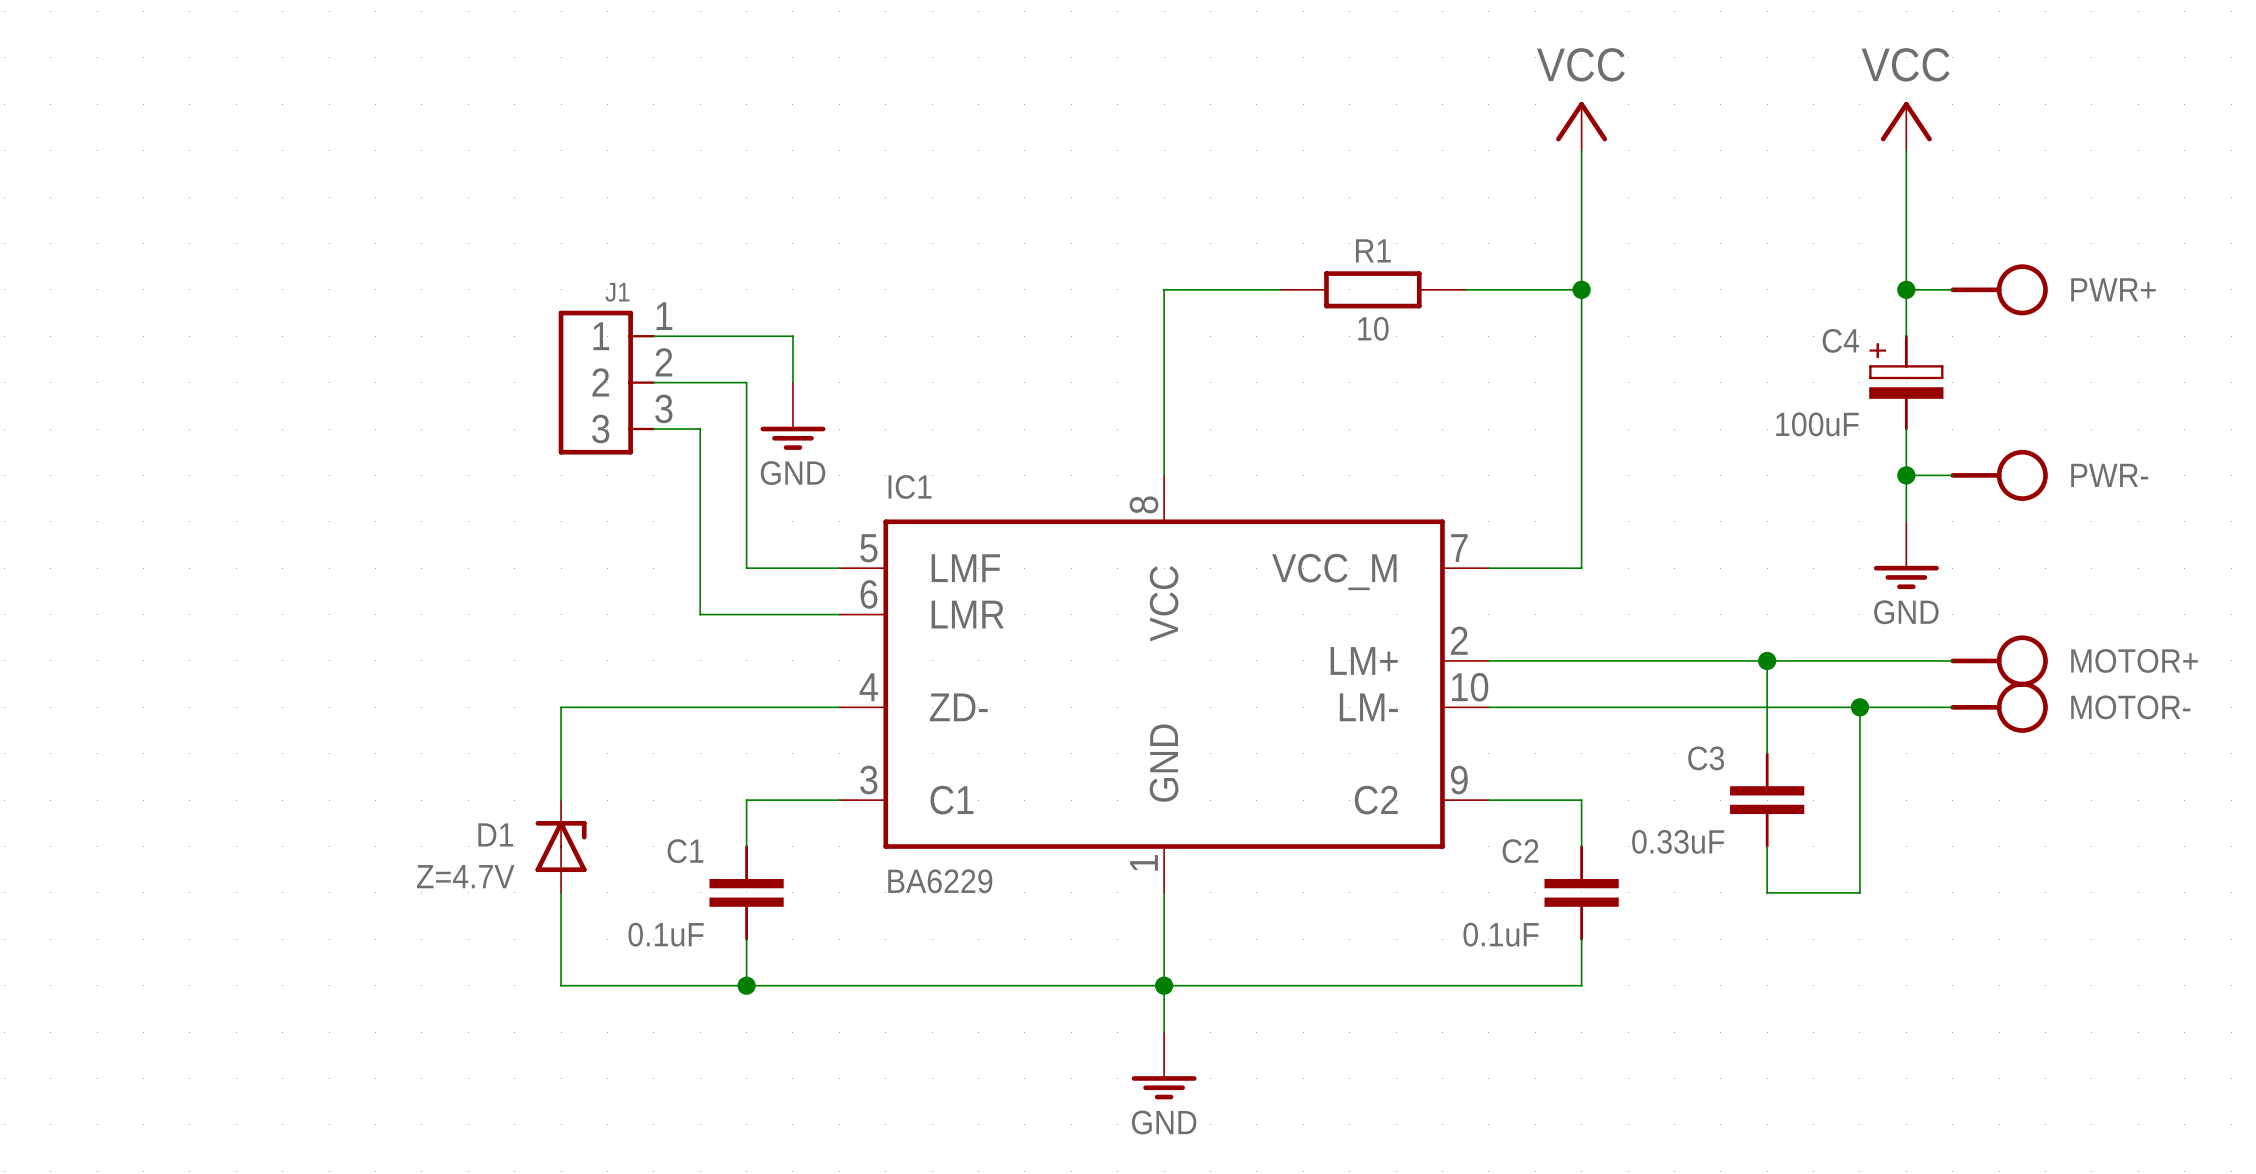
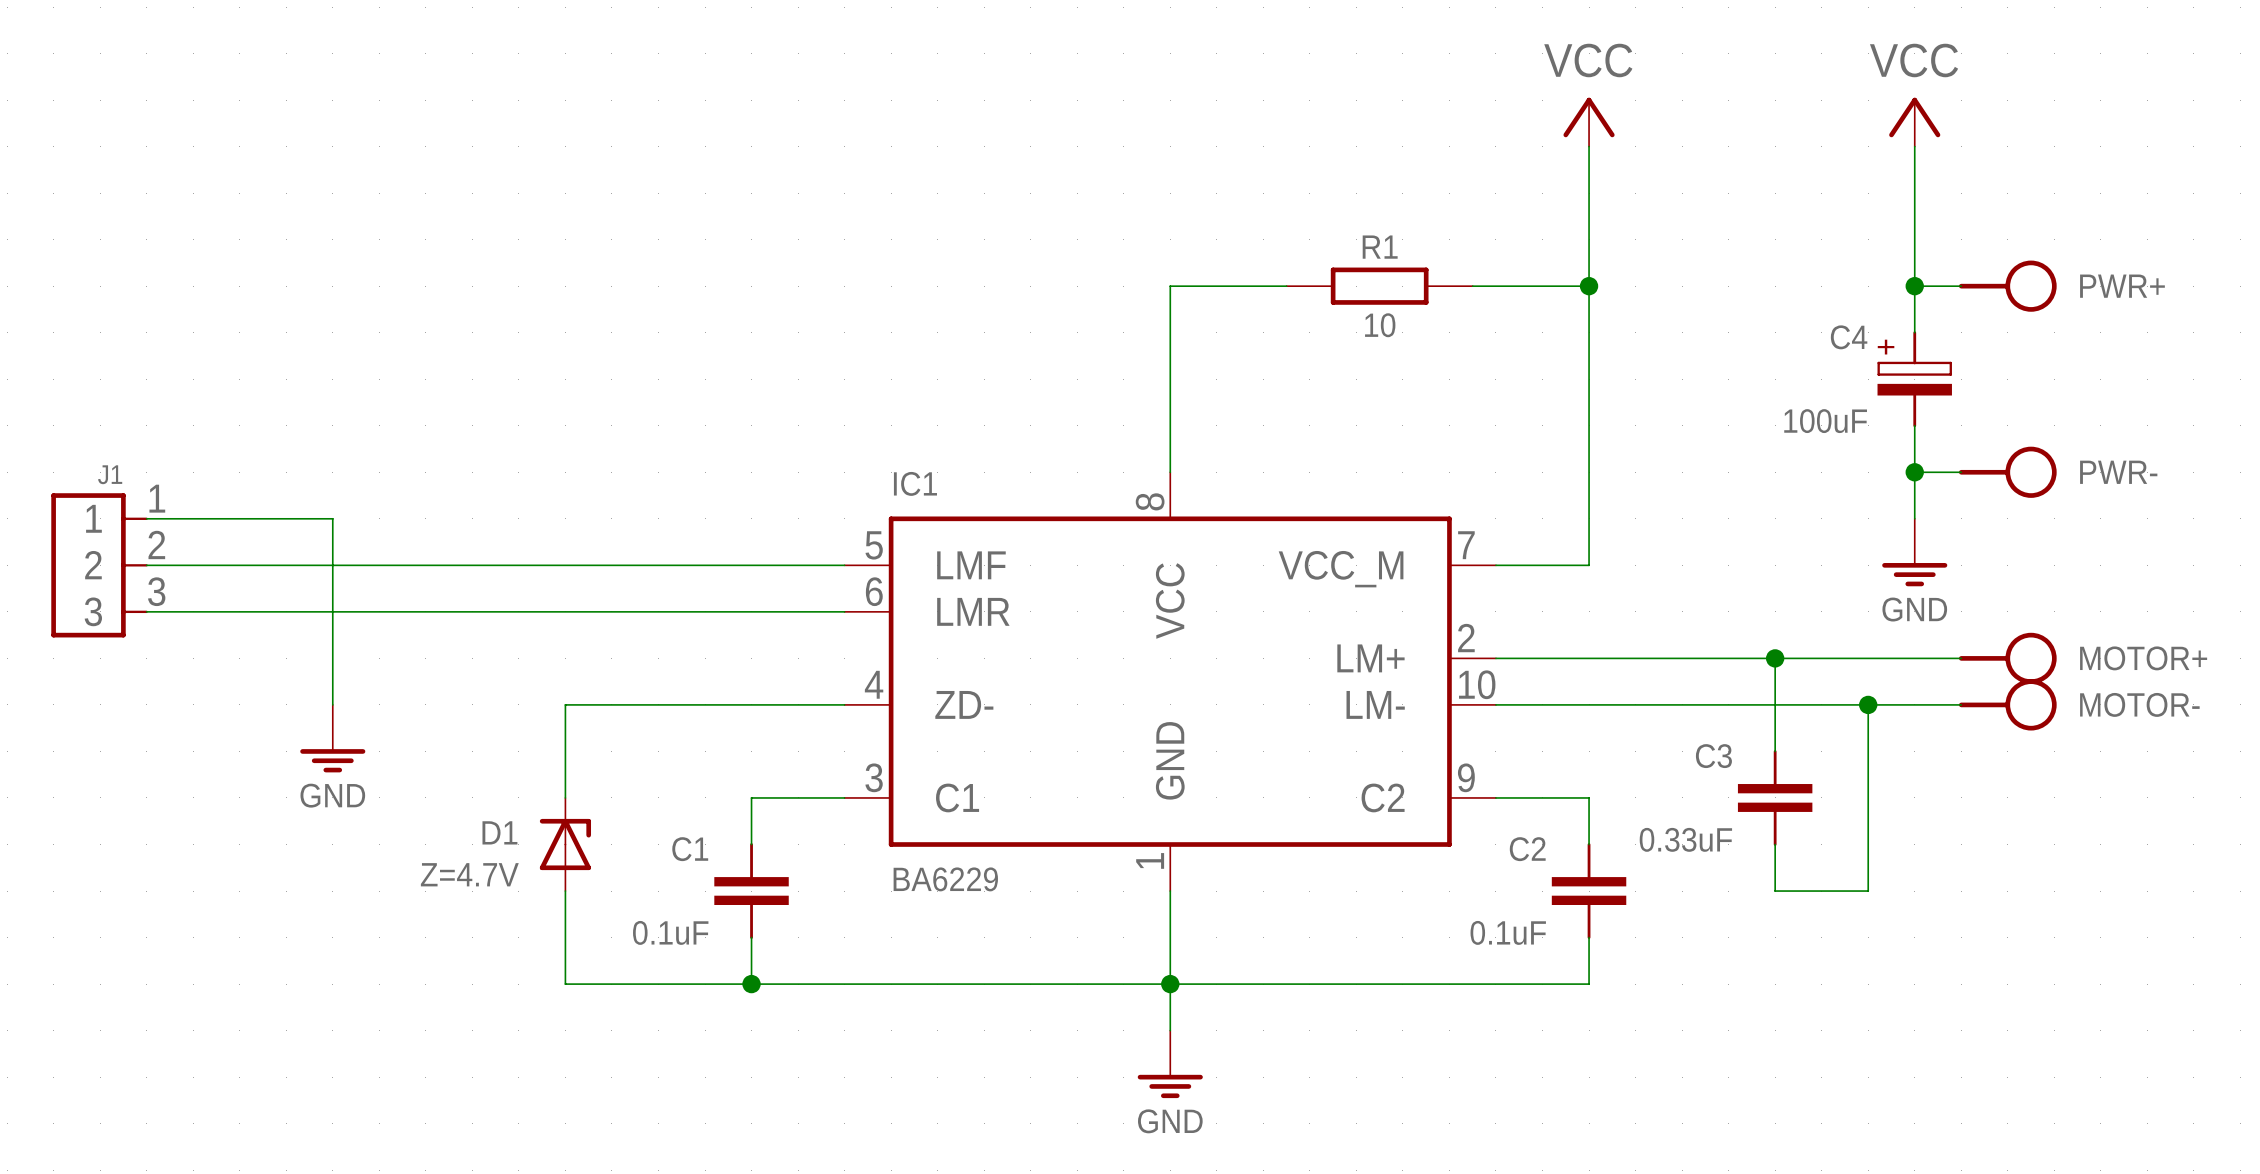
wire: (653, 336) (792, 336) (792, 382) -> none
J1 position: (606, 382) -> (99, 565)
wire: (653, 382) (746, 382) (746, 568) -> (146, 565) (751, 565)
power symbol: GND (792, 416) -> none
wire: (653, 429) (700, 429) (700, 614) -> (146, 611) (705, 611)
wire: none -> (146, 518) (332, 518) (332, 704)
power symbol: none -> GND (332, 738)

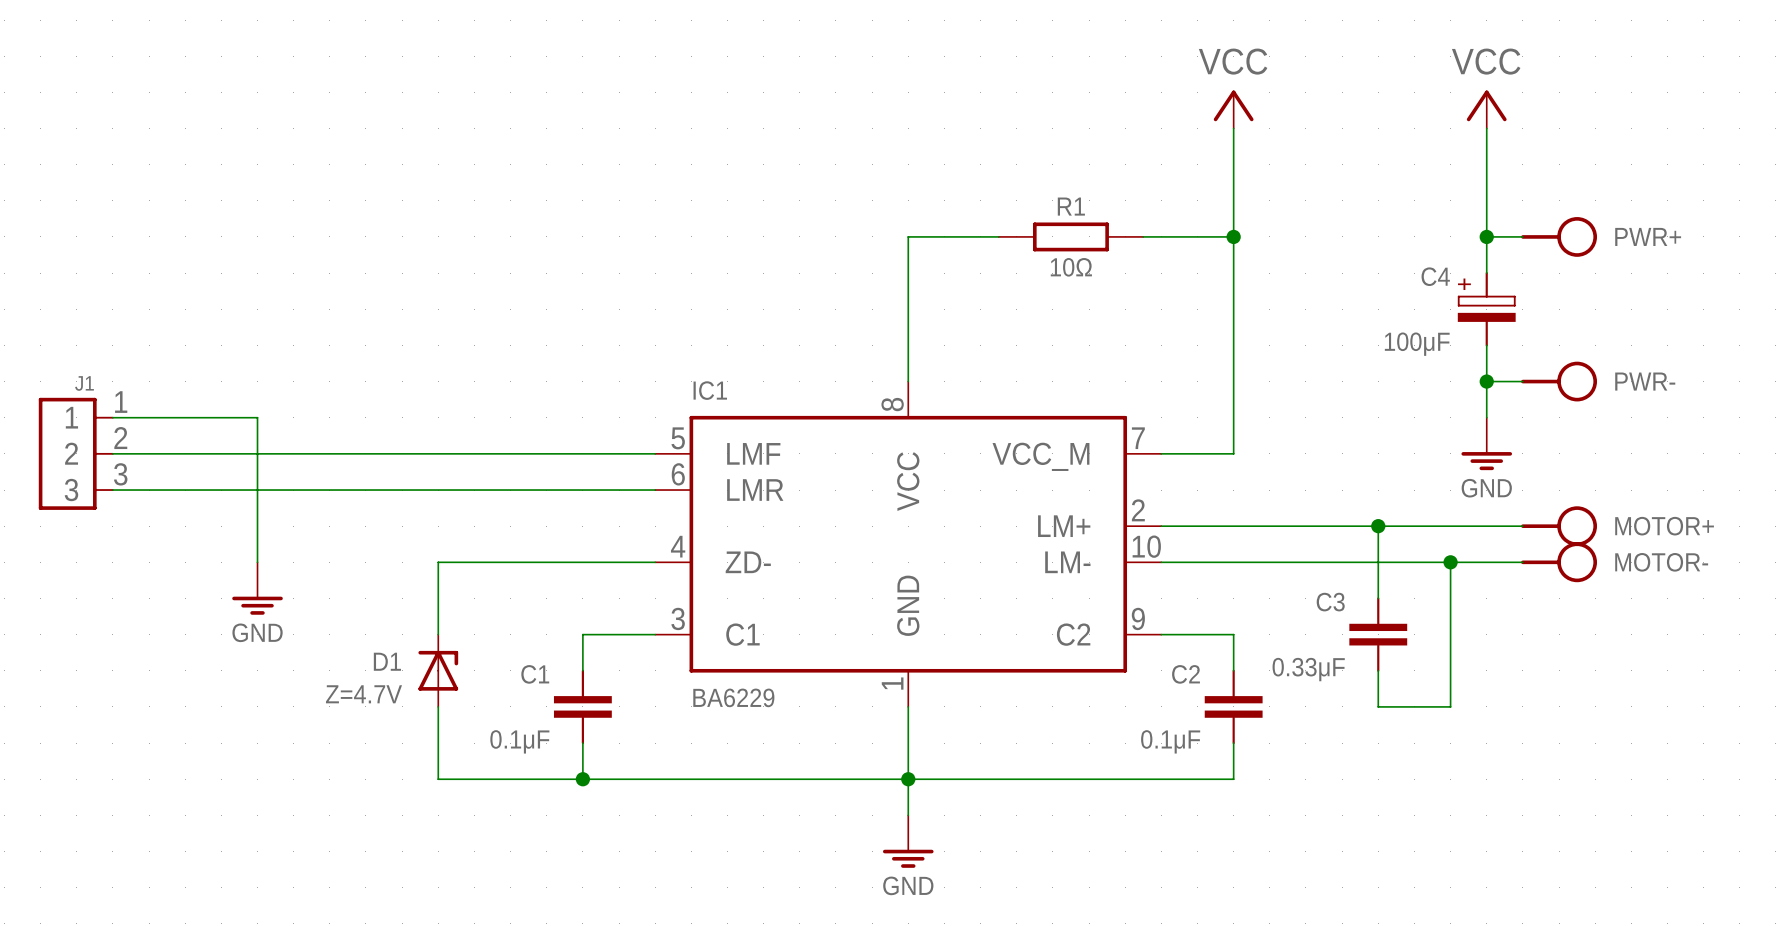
R1 value: 10 (1380, 325) -> 10Ω (1071, 267)
C4 value: 100uF (1825, 421) -> 100μF (1417, 344)
C3 value: 0.33uF (1685, 839) -> 0.33μF (1308, 669)
C1 value: 0.1uF (670, 932) -> 0.1μF (519, 741)
C2 value: 0.1uF (1508, 932) -> 0.1μF (1170, 741)

